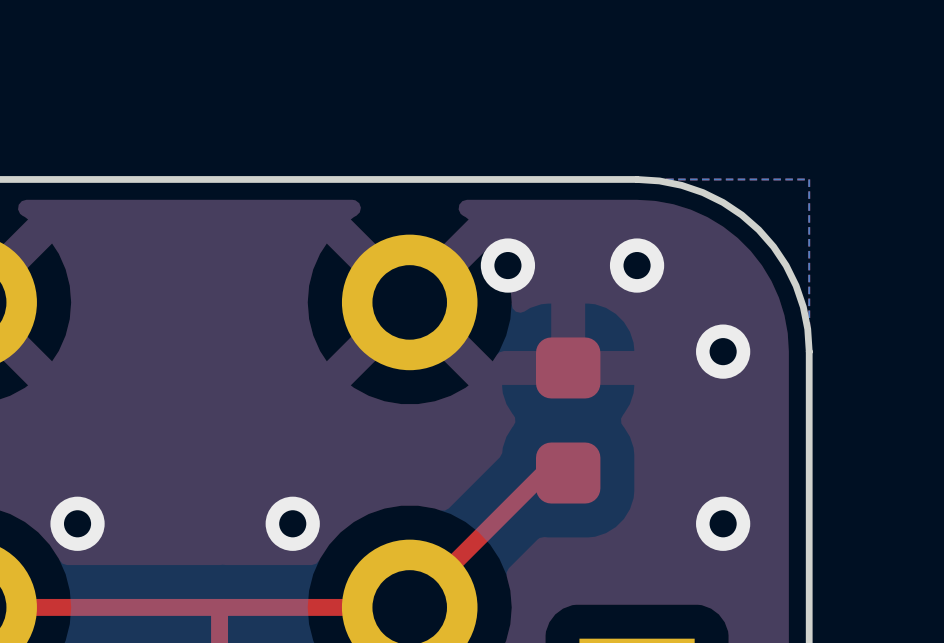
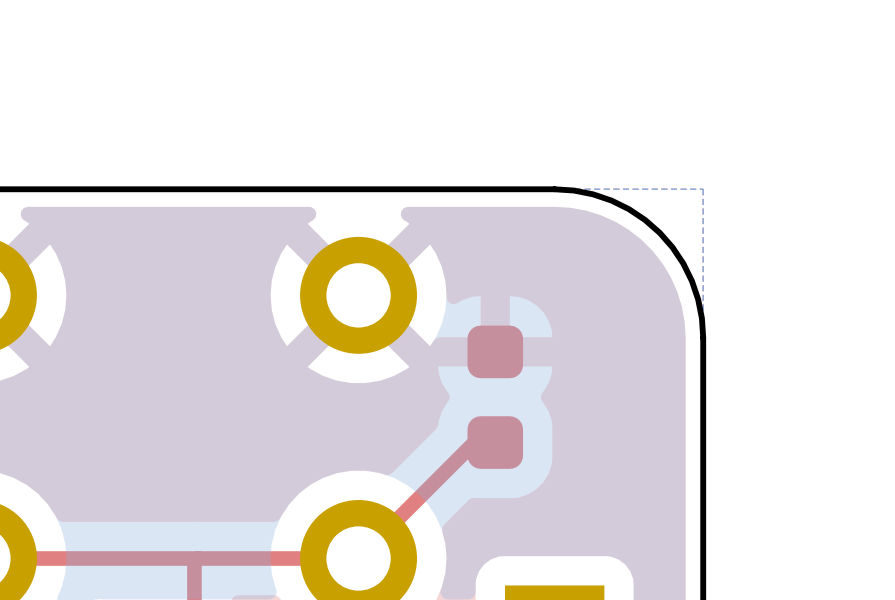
via: (507, 265) -> none
via: (637, 265) -> none
via: (723, 351) -> none
via: (77, 523) -> none
via: (292, 523) -> none
via: (723, 523) -> none

